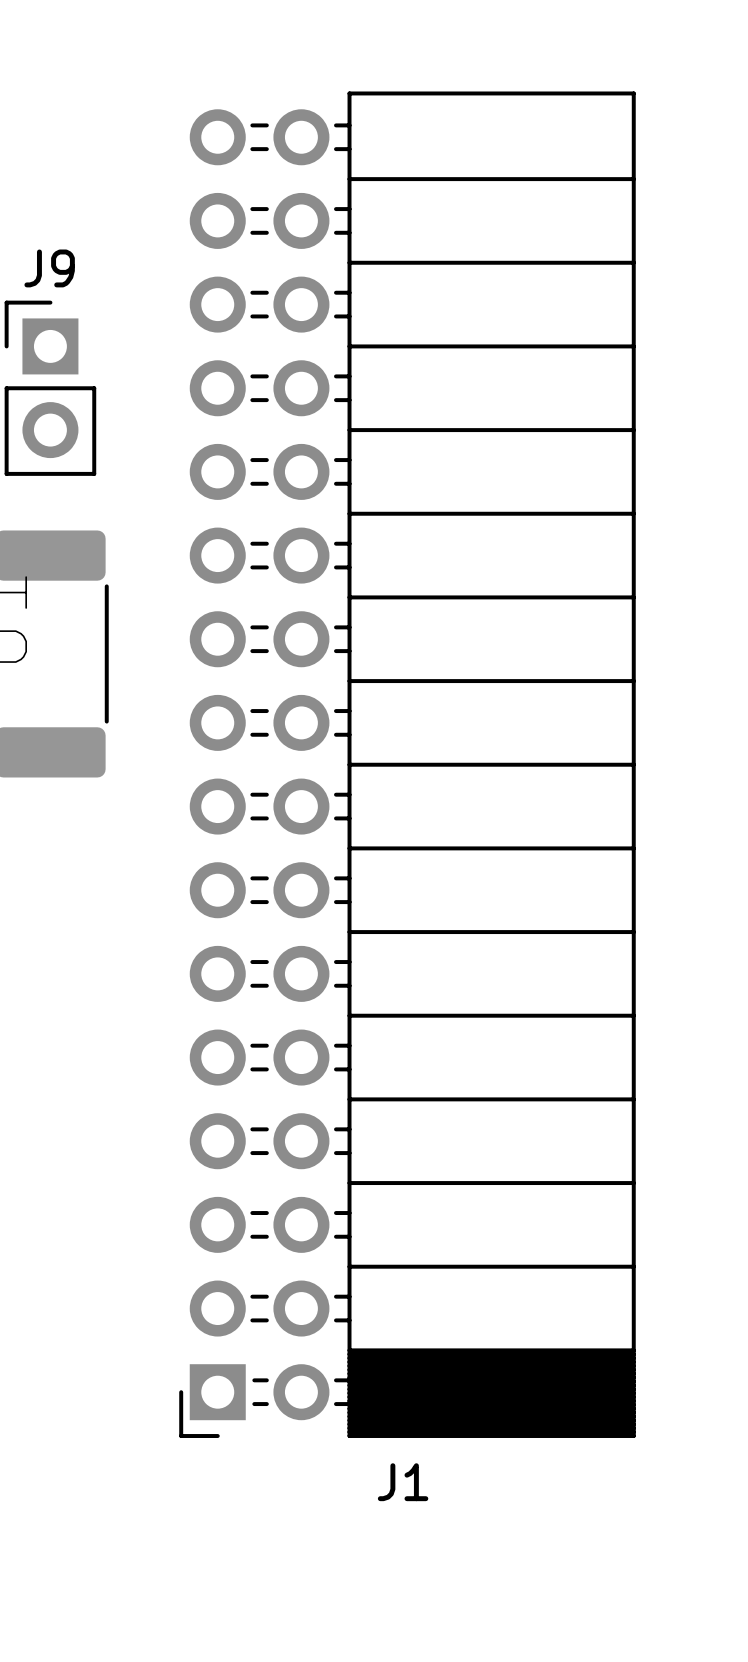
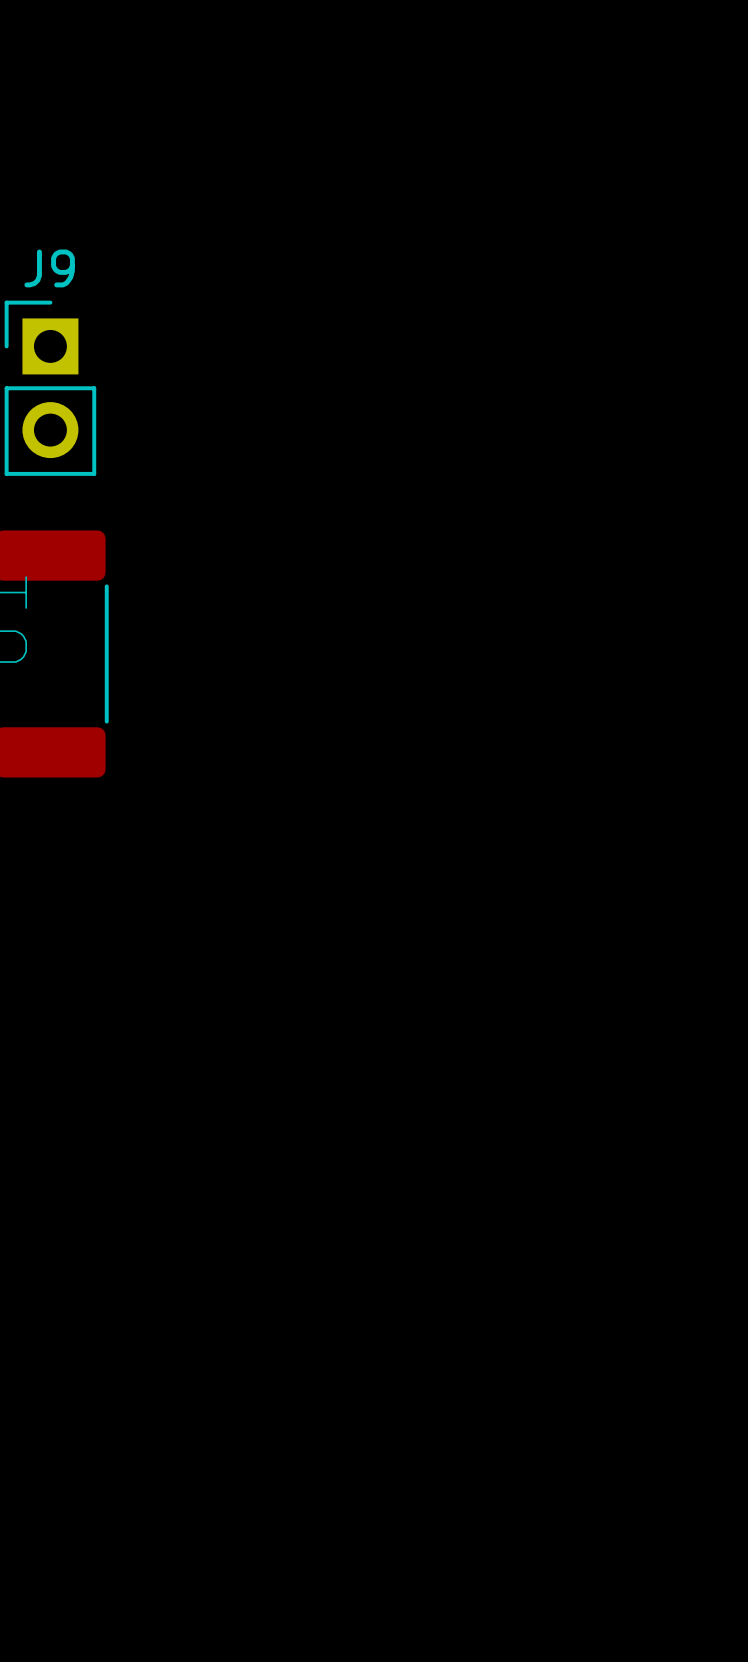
J1: (407, 764) -> none

